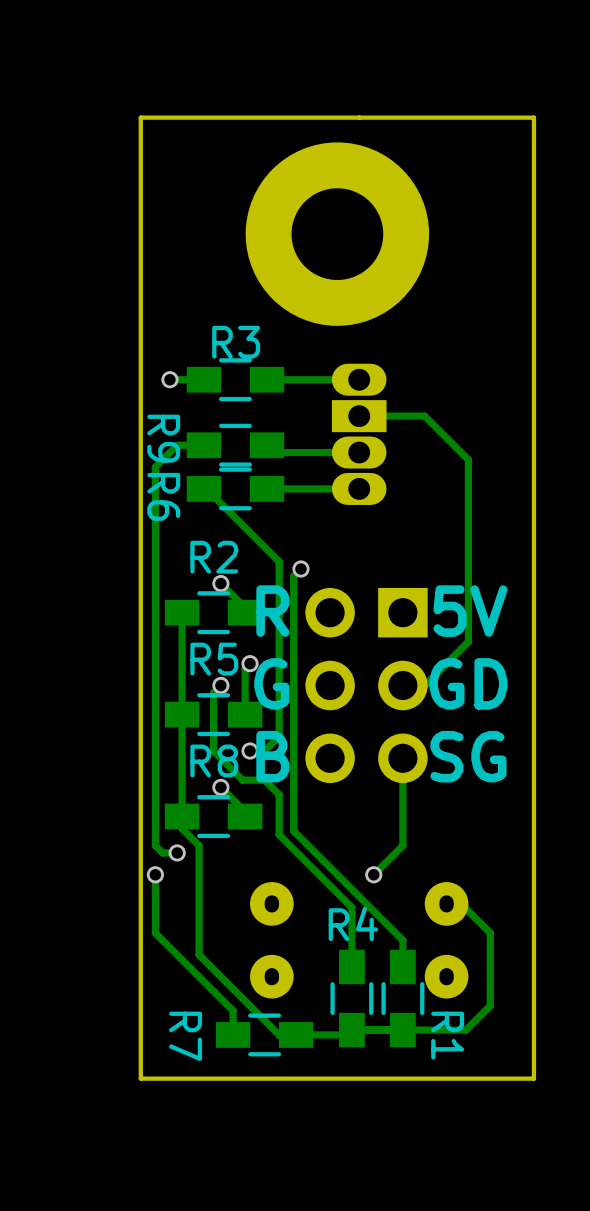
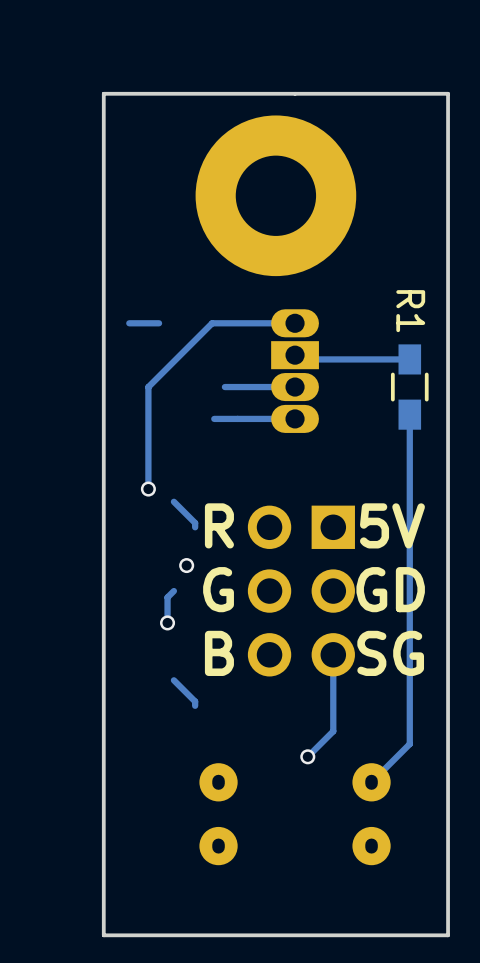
via: (169, 379) -> none
R3: (235, 379) -> none
track: none -> (214, 323) (148, 387) (148, 489)
track: (359, 416) (424, 416) (468, 459) (468, 641) (424, 685) (402, 685) -> (295, 355) (299, 359) (409, 359)
track: (203, 445) (177, 445) (155, 467) (155, 845) (162, 852) (177, 852) -> none
R9: (235, 445) -> none
track: (203, 488) (206, 488) (279, 561) (279, 736) (264, 751) (250, 751) -> none
R6: (235, 488) -> none
track: (300, 569) (293, 576) (293, 831) (402, 940) (402, 967) -> none
via: (300, 569) -> none
via position: (220, 583) -> (148, 489)
track: (182, 612) (182, 828) (199, 845) (199, 954) (279, 1034) (347, 1034) (351, 1030) (466, 1030) (490, 1005) (490, 933) (461, 903) (446, 903) -> (409, 414) (409, 744) (371, 782)
R2: (213, 612) -> none
track: (250, 663) (245, 668) (245, 714) -> none
via position: (250, 663) -> (186, 565)
via: (220, 685) -> none
R5: (213, 714) -> none
track: (213, 721) (213, 751) (242, 780) (264, 780) (279, 794) (279, 834) (351, 907) (351, 967) -> none
via: none -> (167, 622)
via: (250, 751) -> none
via: (220, 787) -> none
R8: (213, 816) -> none
via: (177, 852) -> none
track: (155, 874) (155, 933) (233, 1010) (233, 1034) -> none
via: (155, 874) -> none
R4: (351, 998) -> none
R1 position: (402, 998) -> (409, 387)
R7: (264, 1034) -> none
R1 name position: R1 (447, 1035) -> R1 (410, 311)

